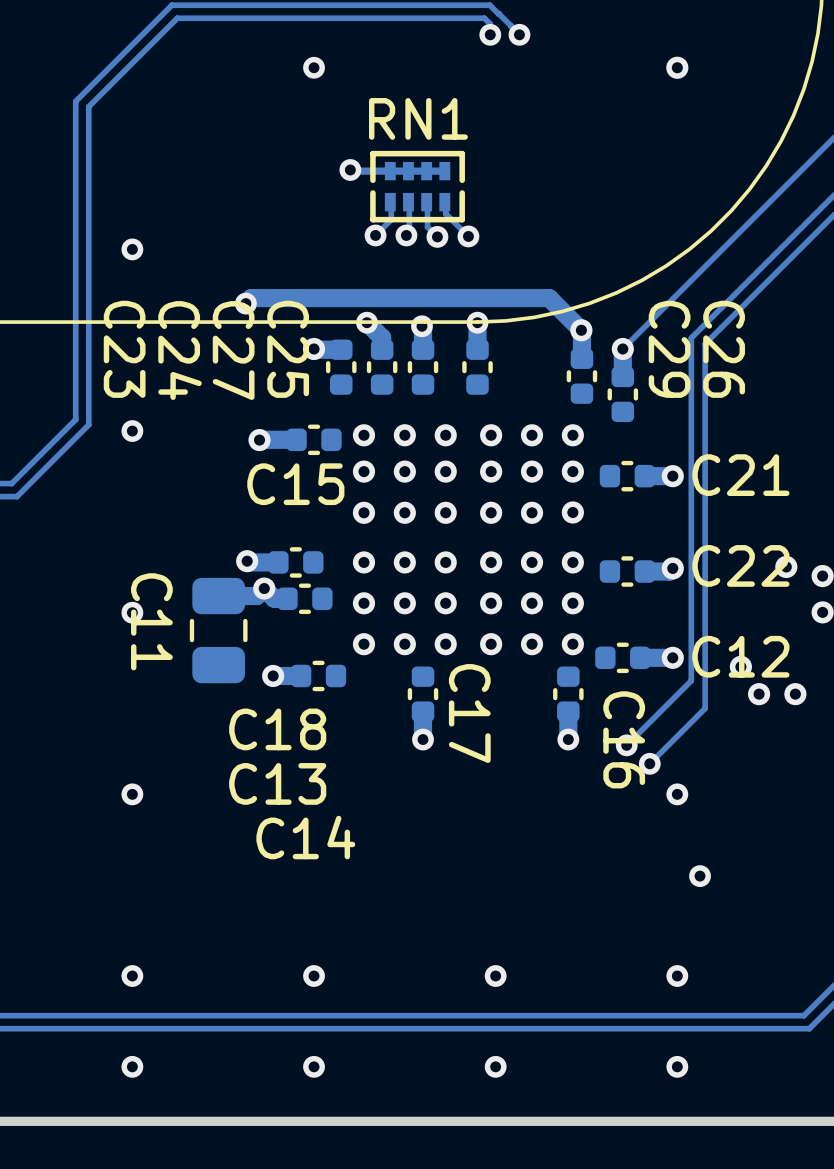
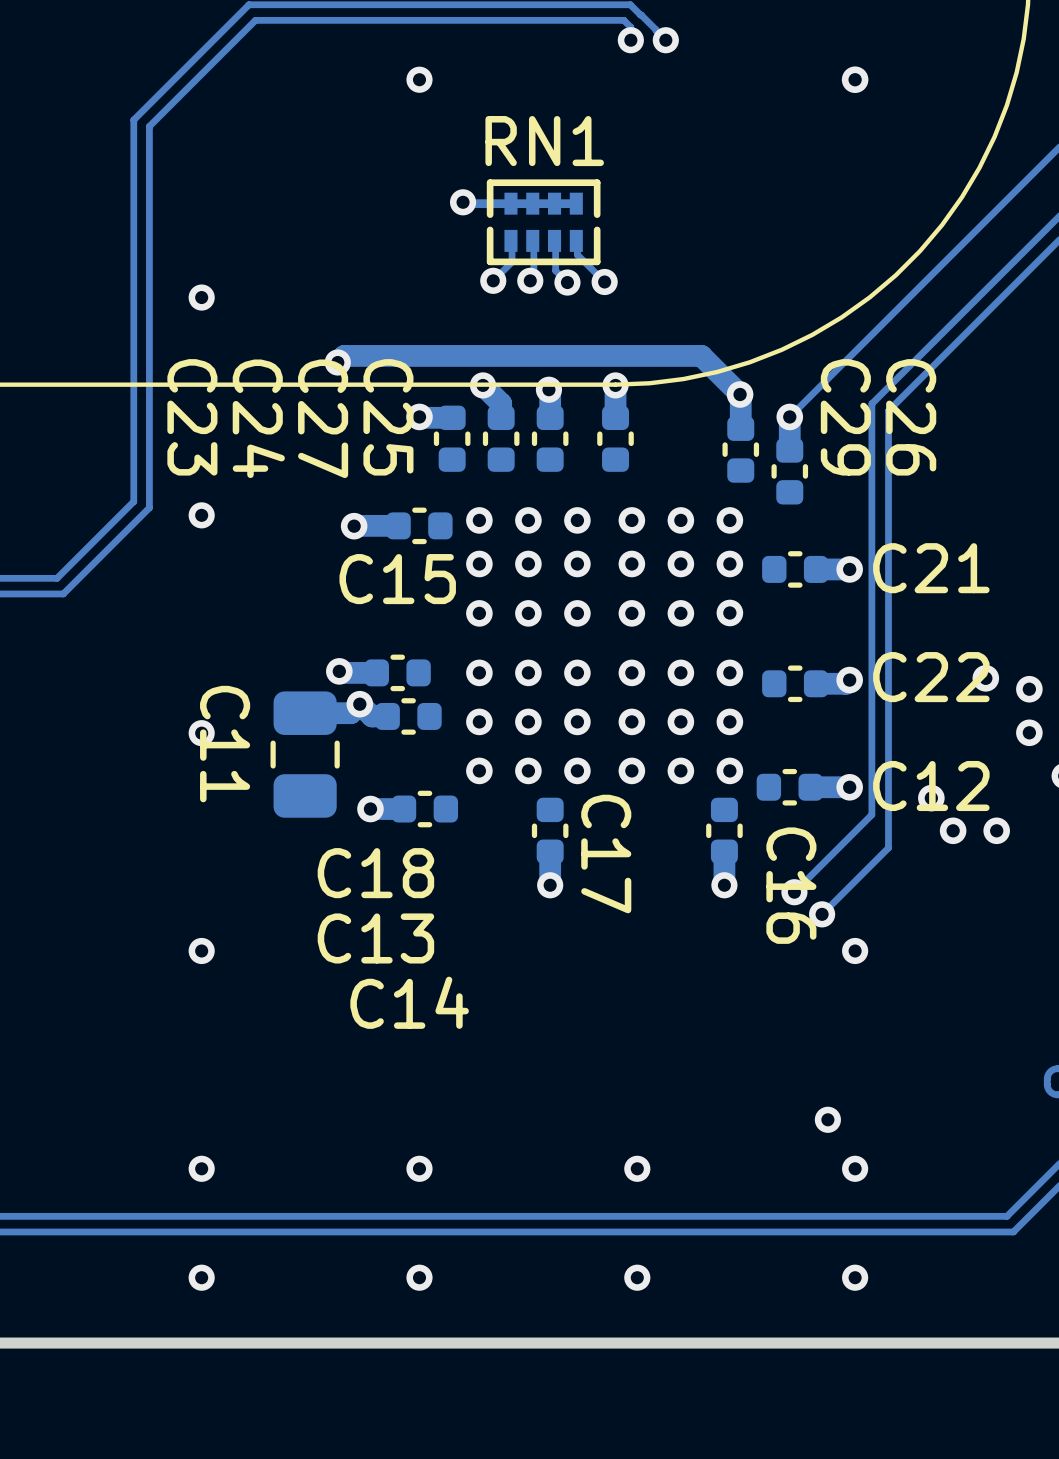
via position: (700, 876) -> (827, 1119)

